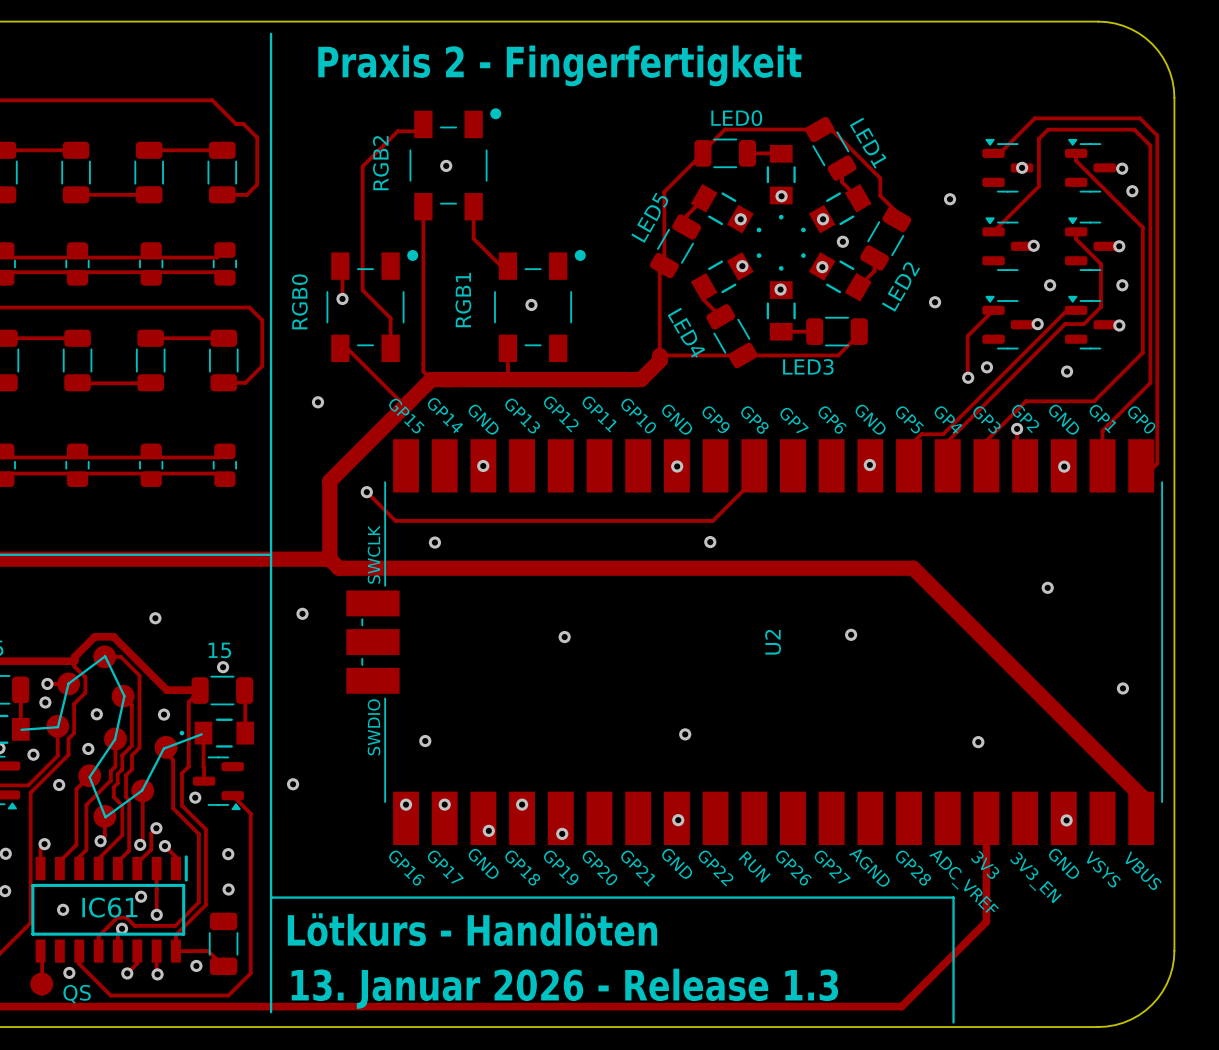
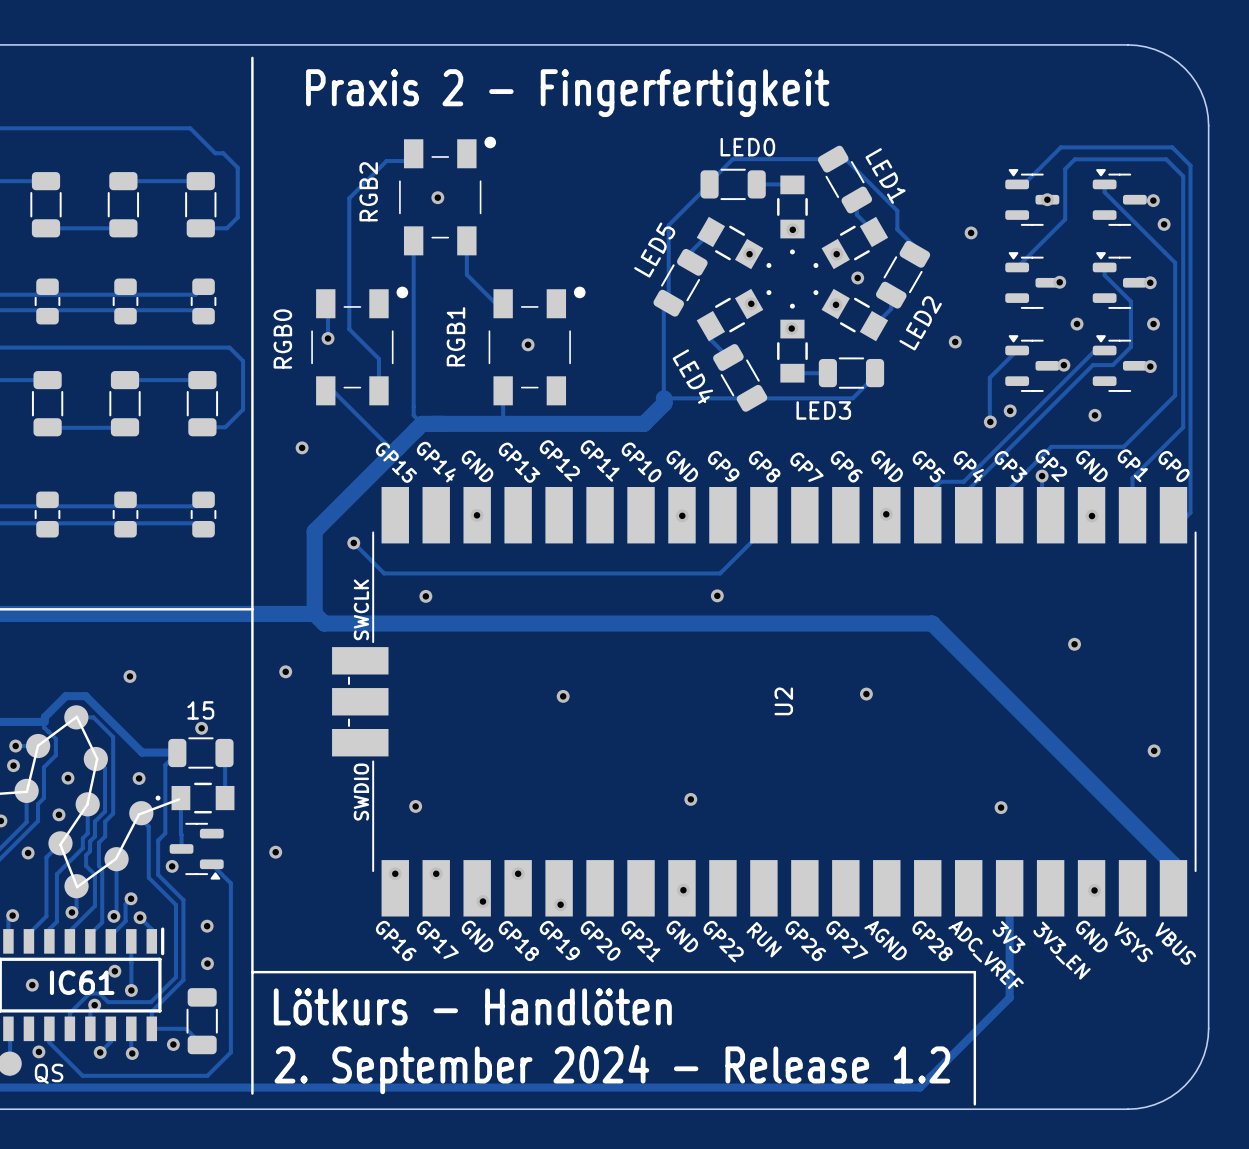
text: 13. Januar 2026 - Release 1.3 (564, 988) -> 2. September 2024 - Release 1.2 (612, 1069)

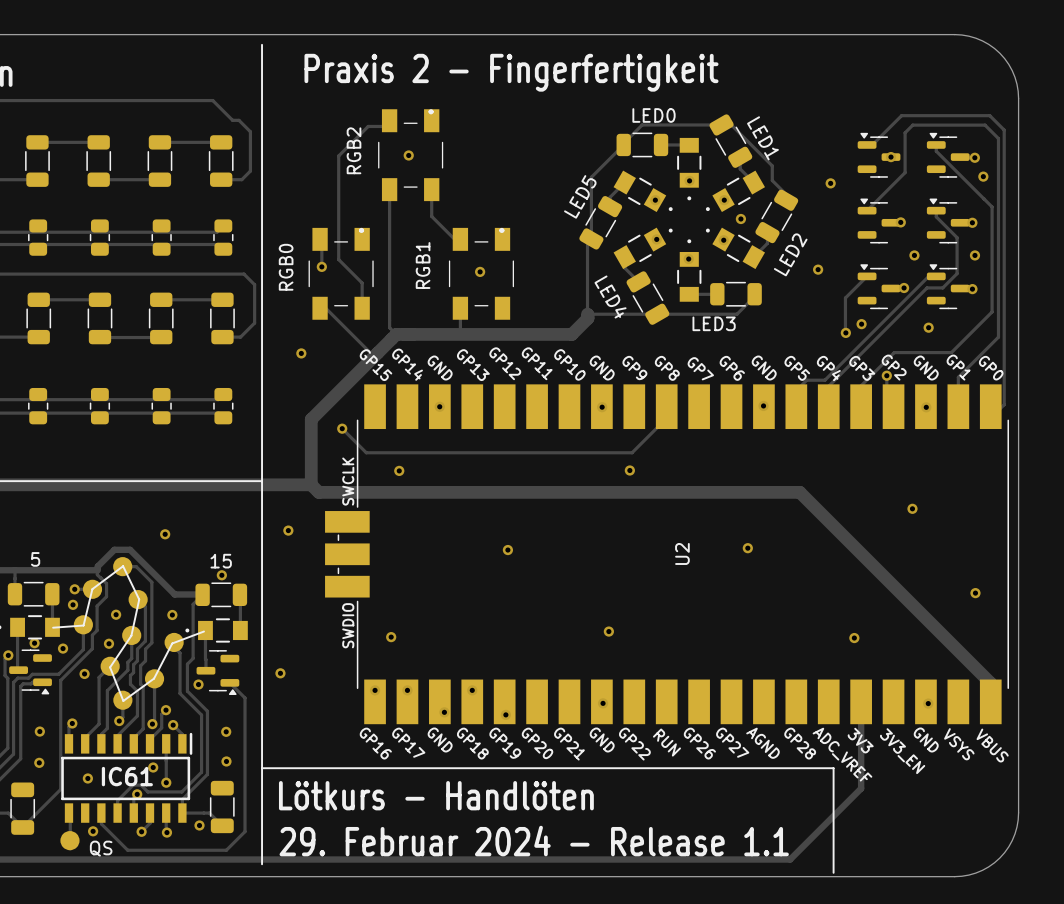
part footprint: [399, 136, 497, 256] -> [378, 109, 444, 202]
part footprint: [311, 286, 409, 406] -> [308, 227, 374, 320]
part footprint: [488, 286, 586, 406] -> [448, 227, 514, 320]
text: 2. September 2024 - Release 1.2 (612, 1069) -> 29. Februar 2024 - Release 1.1 (534, 841)

